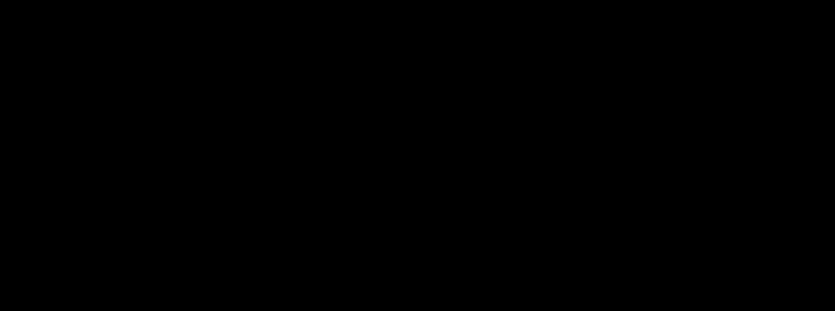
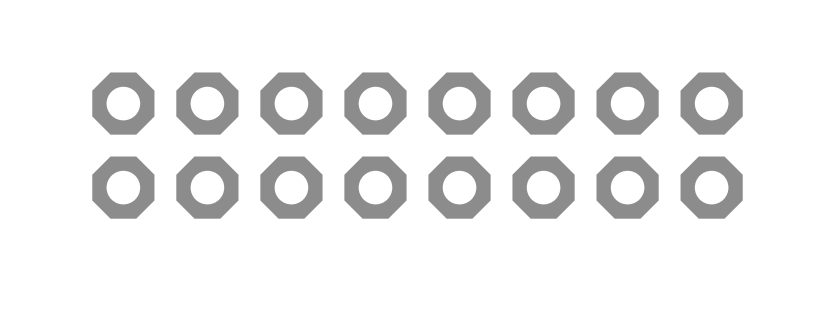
part: none -> (417, 145)

